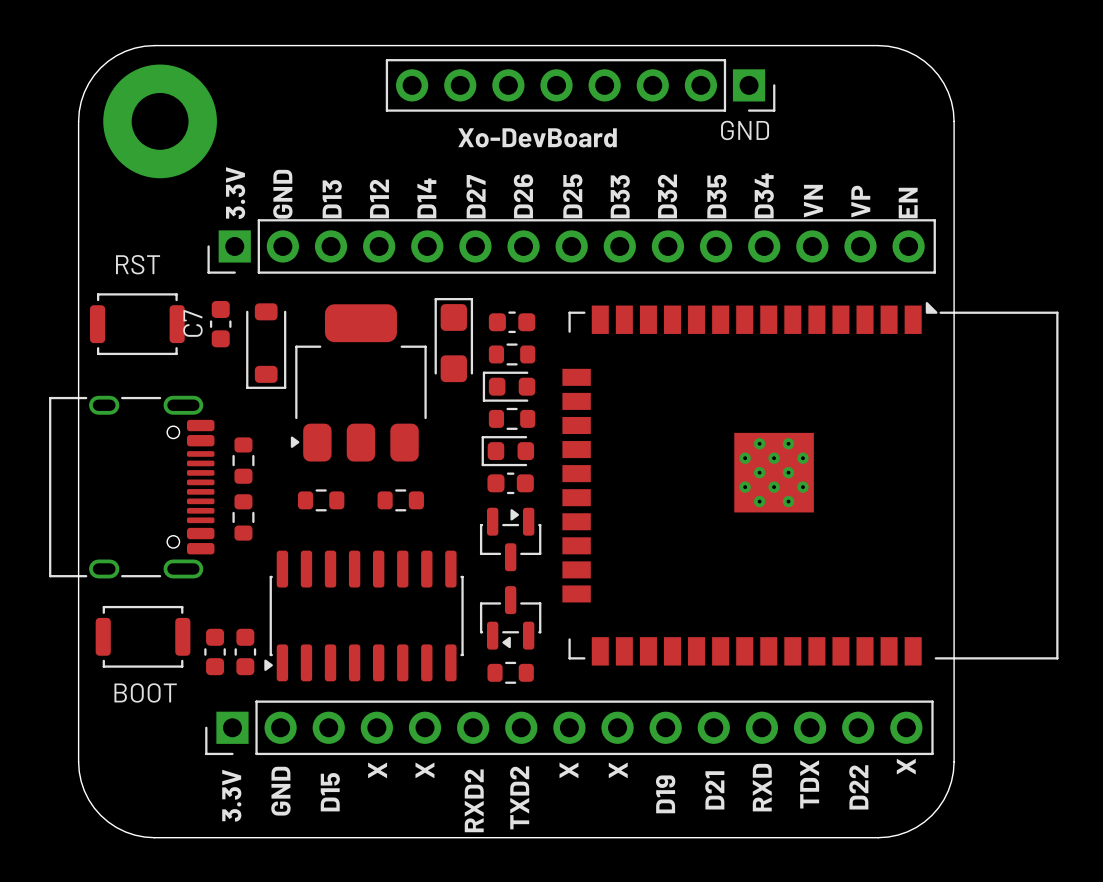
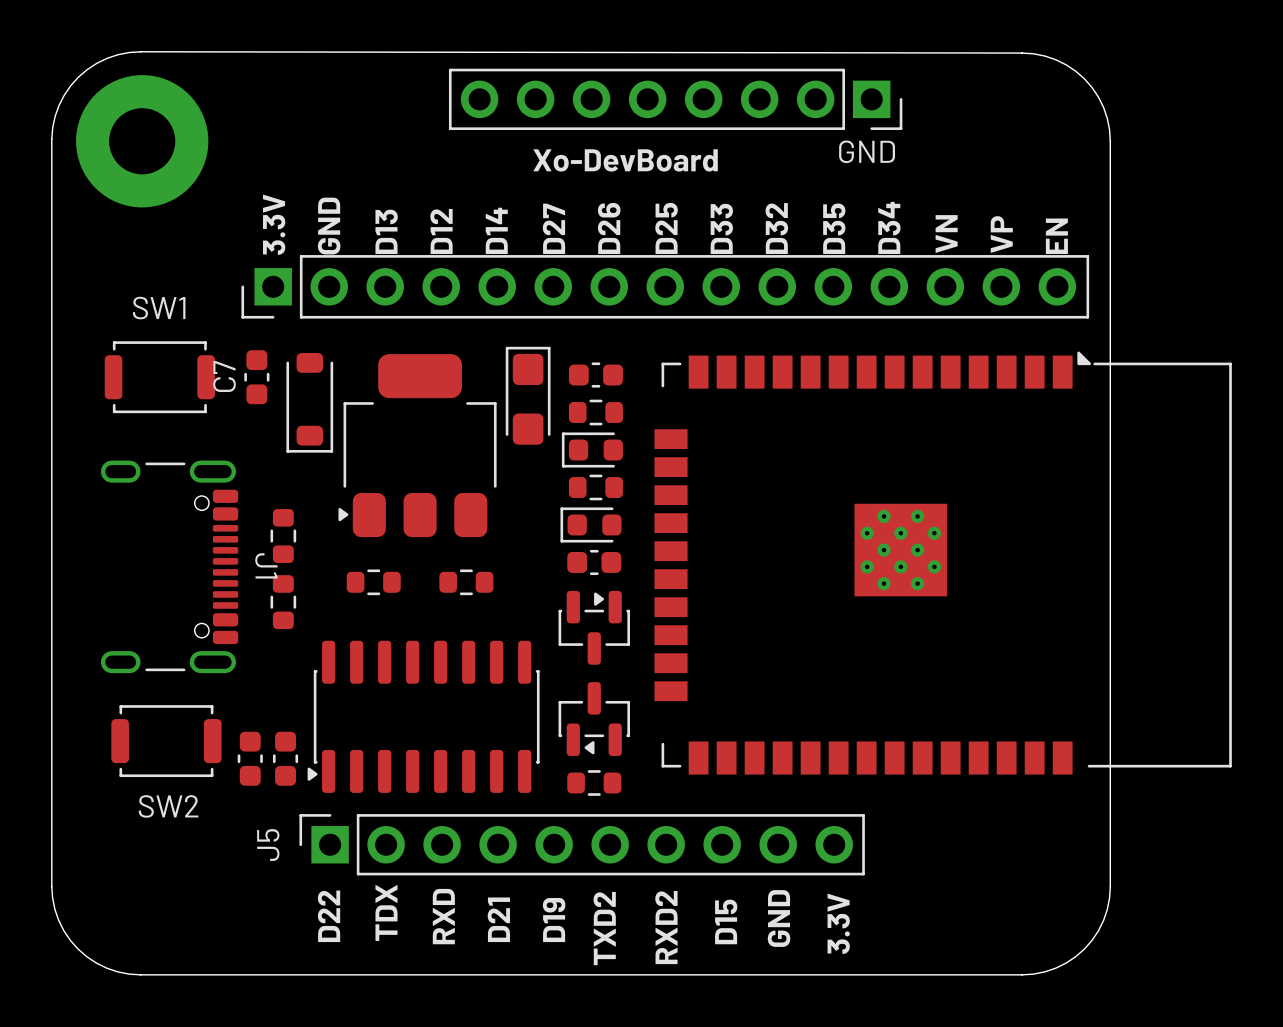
board edge: (878, 45) (154, 45) (125, 51) (100, 67) (84, 92) (78, 121) (79, 771) (88, 799) (108, 822) (134, 835) (154, 837) -> (1022, 53) (140, 51) (106, 58) (78, 77) (58, 105) (51, 139) (52, 898) (58, 920) (70, 940) (78, 949) (96, 963) (117, 971) (129, 974) (179, 974)
part position: (160, 121) -> (142, 141)
RST name: RST (138, 264) -> SW1 (159, 308)
part: (131, 487) -> none
J1: none -> (169, 566)
BOOT name: BOOT (145, 692) -> SW2 (168, 806)
J5: none -> (582, 844)
part: (569, 727) -> none
text: X (906, 766) -> none
text: X (377, 770) -> none
text: X (424, 770) -> none
text: X (568, 770) -> none
text: X (618, 770) -> none
text: none -> TDX (386, 912)
text: TDX (809, 784) -> none
text: none -> D22 (329, 916)
text position: RXD (762, 787) -> RXD (443, 916)
text: D22 (858, 787) -> none
text position: D21 (714, 790) -> D21 (498, 919)
text position: GND (280, 791) -> GND (779, 918)
text position: D15 (330, 792) -> D15 (726, 921)
text: none -> 3.3V (838, 923)
text position: D19 (665, 794) -> D19 (554, 920)
text: 3.3V (231, 795) -> none
text position: RXD2 (474, 800) -> RXD2 (666, 927)

